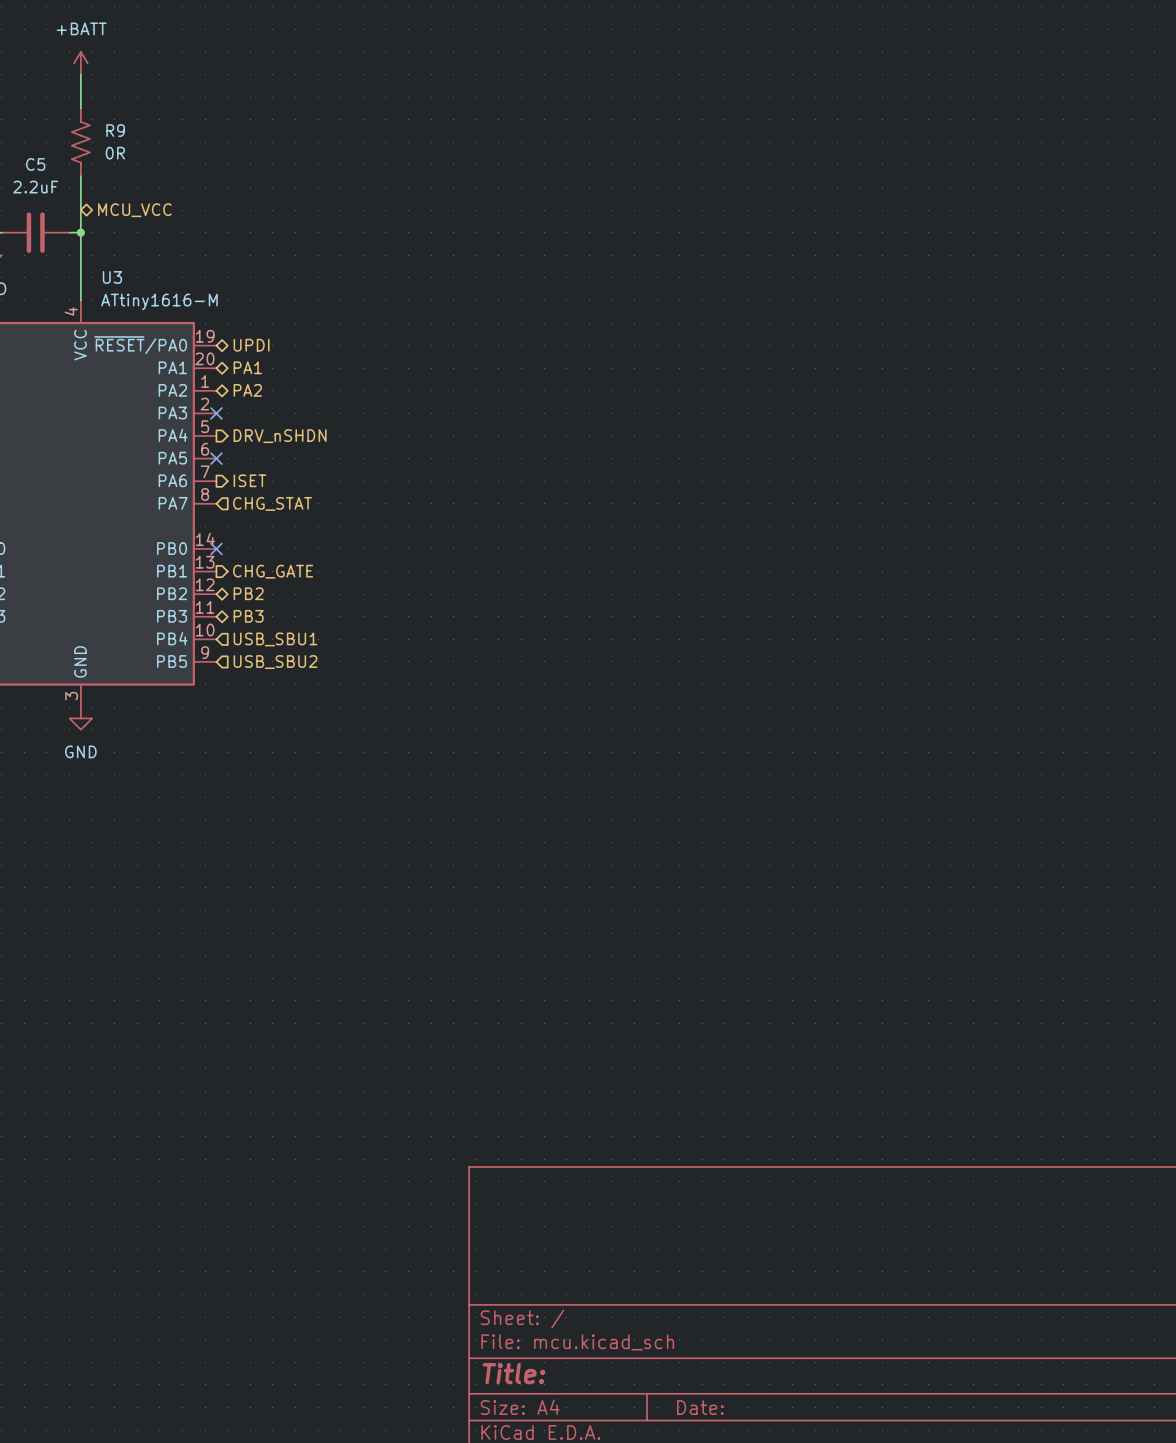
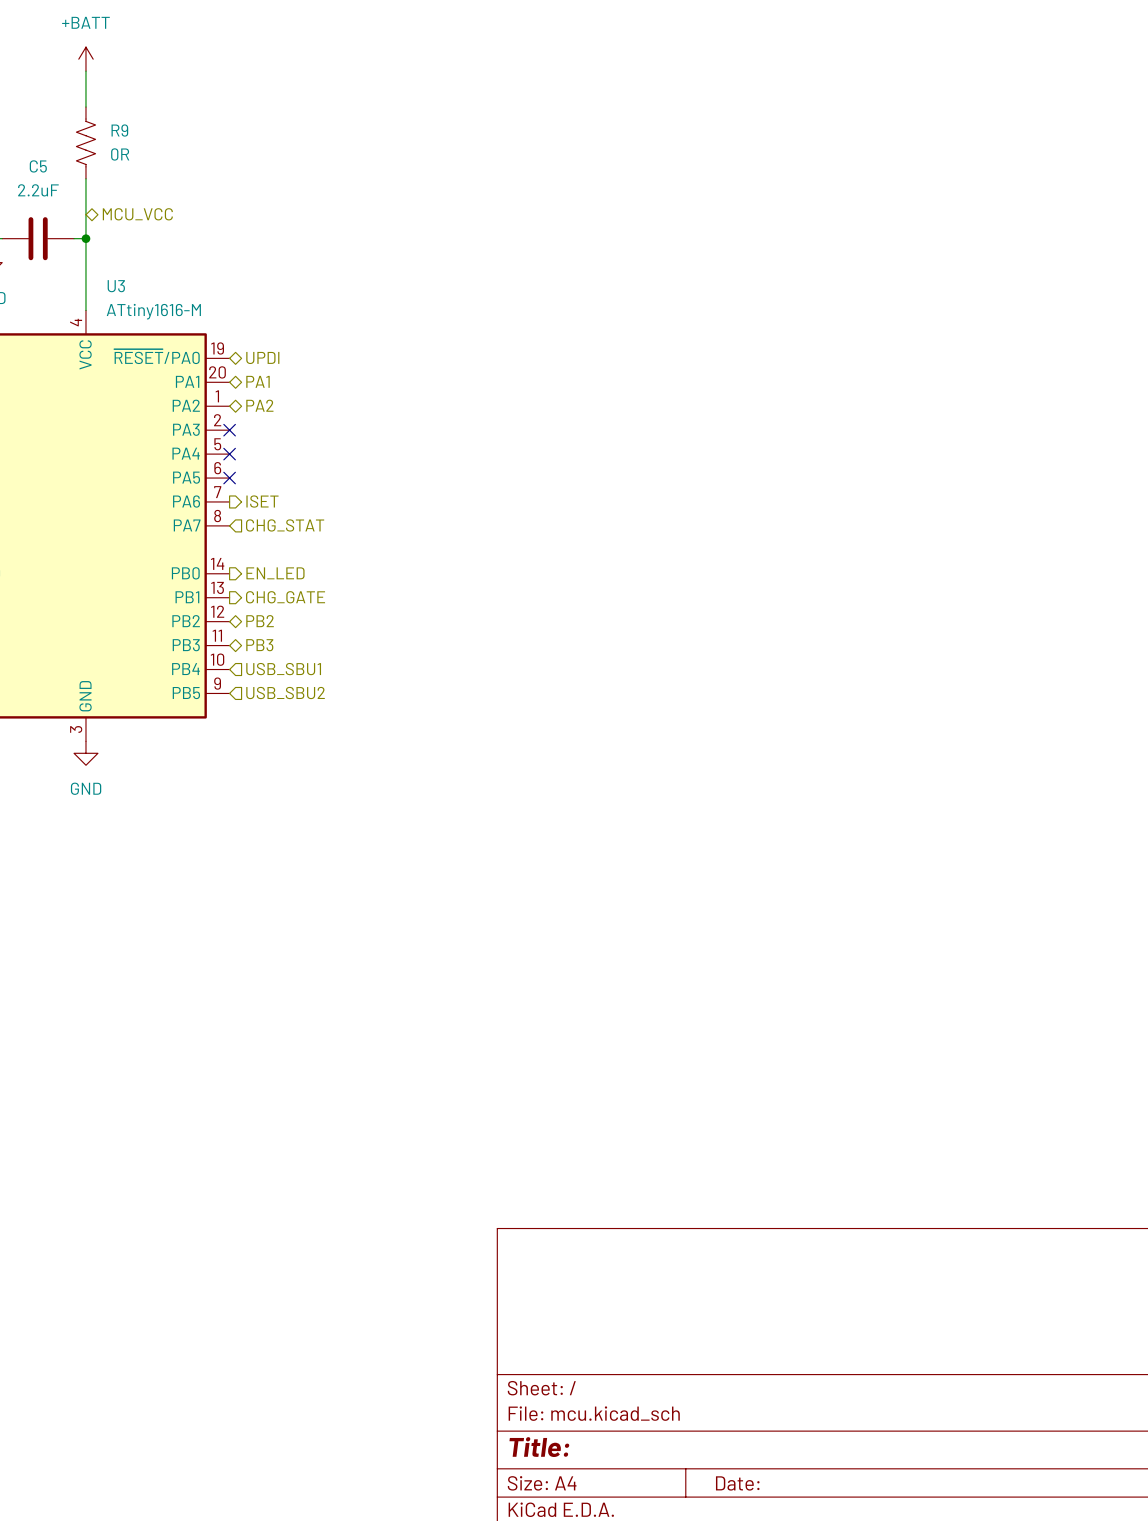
no-connect mark: none -> (229, 454)
hierarchical label: DRV_nSHDN (280, 436) -> none
no-connect mark: (216, 548) -> none
hierarchical label: none -> EN_LED (275, 573)

